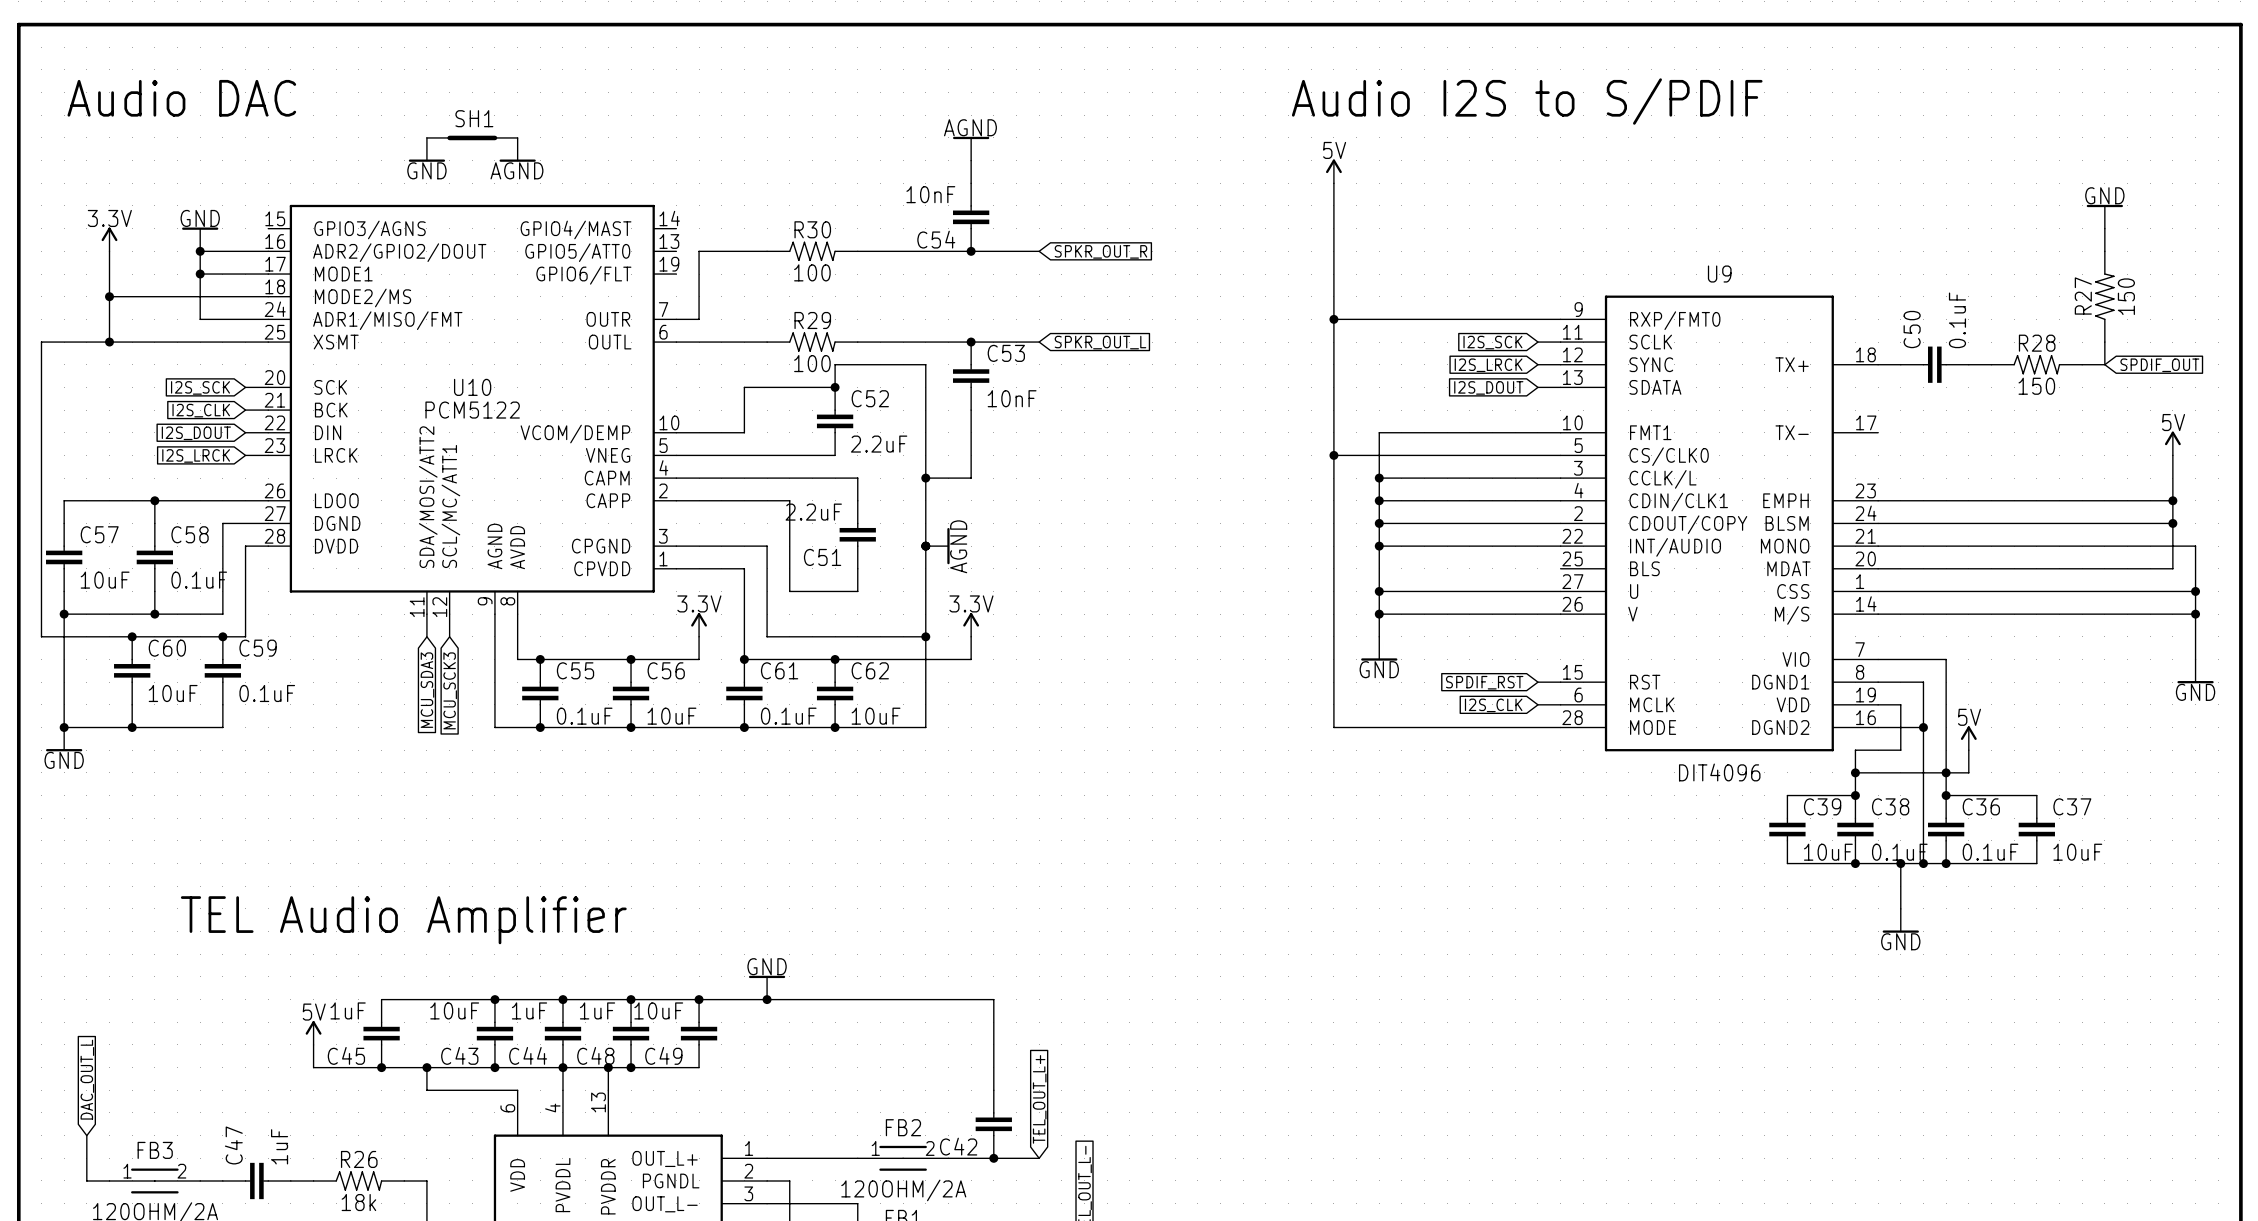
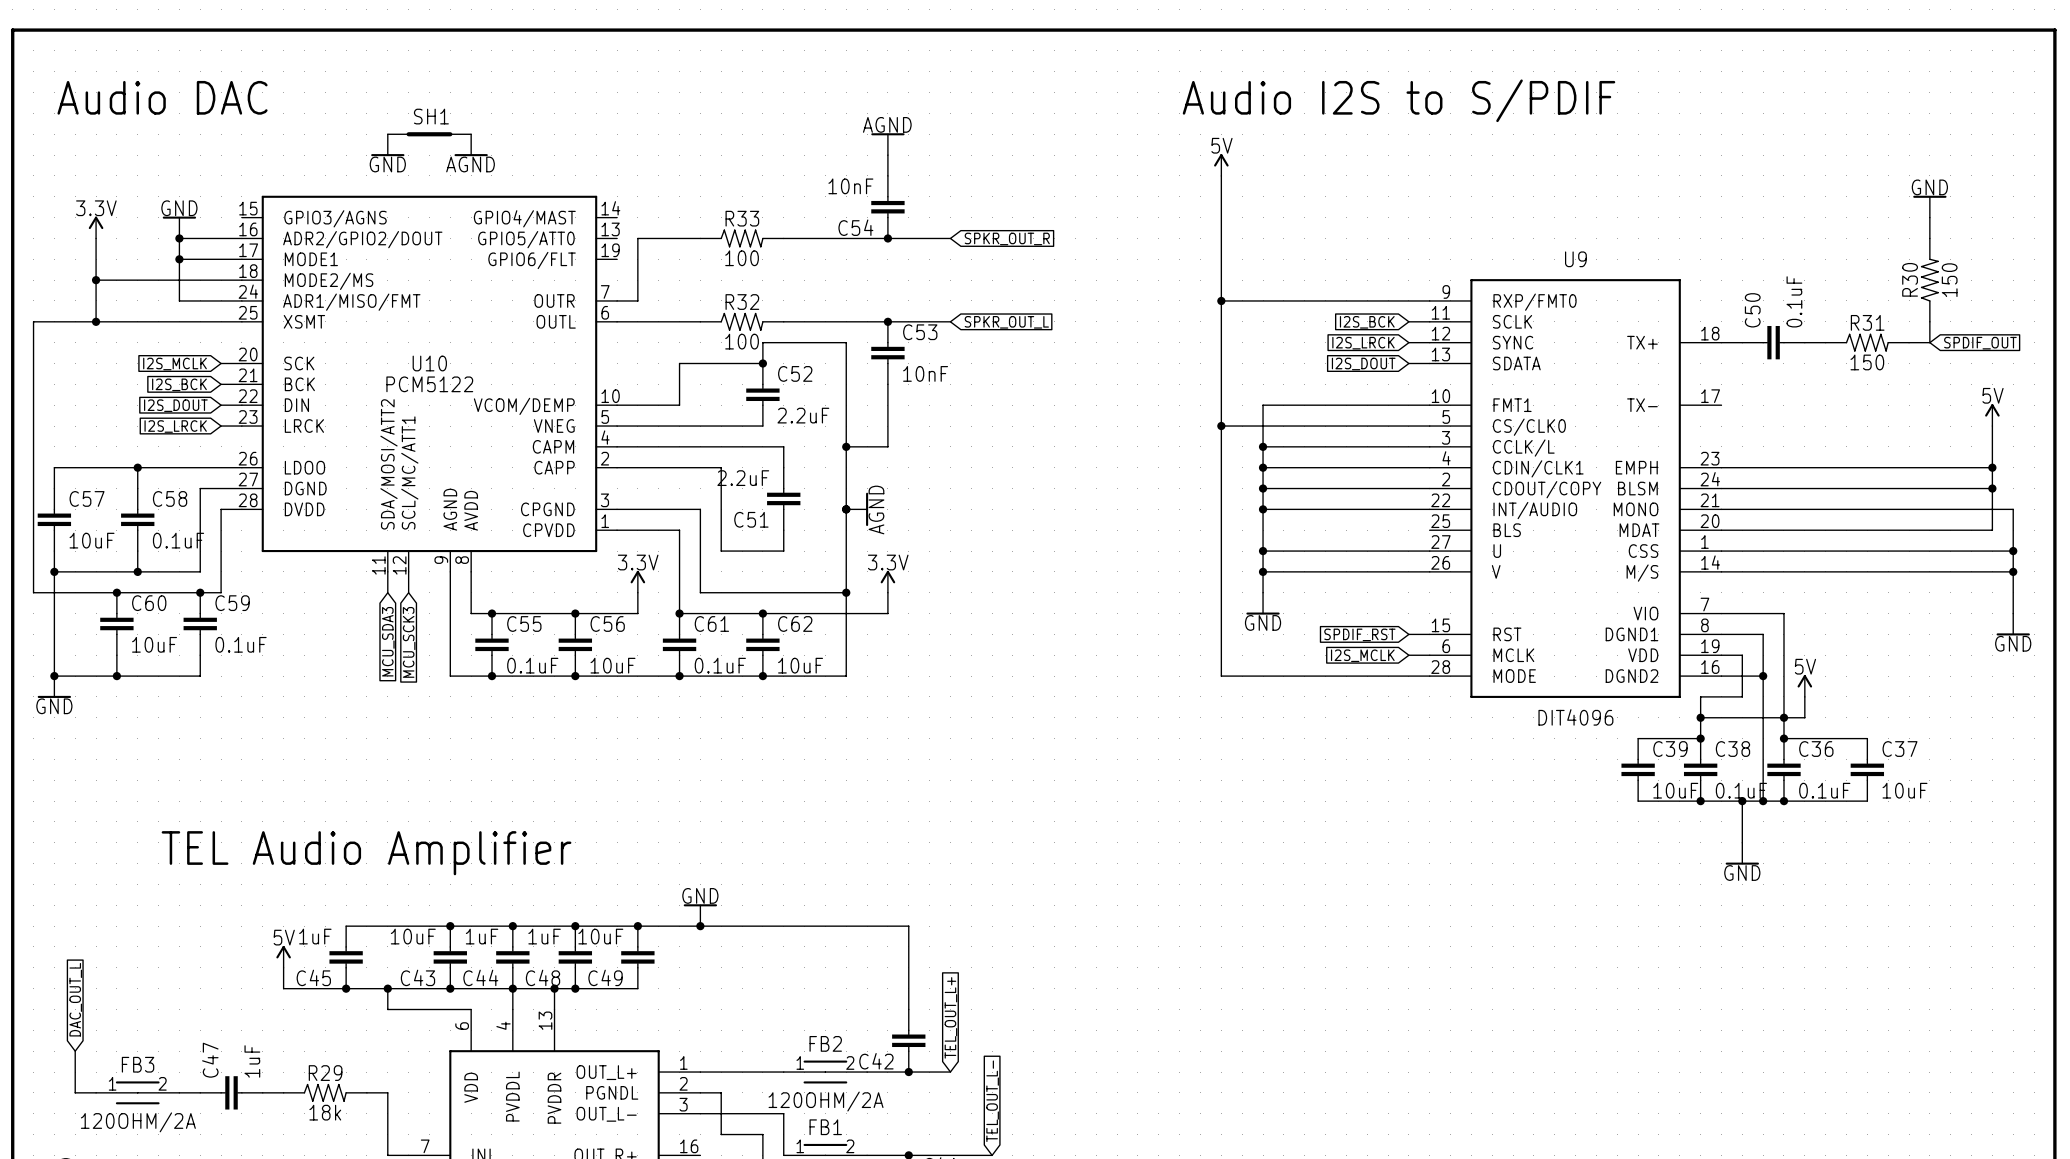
R30 name: R30 (812, 229) -> R33 (742, 218)
R27 name: R27 (2083, 296) -> R30 (1910, 279)
R29 name: R29 (812, 320) -> R32 (742, 302)
global label: I2S_SCK (1492, 342) -> I2S_BCK (1367, 322)
R28 name: R28 (2037, 343) -> R31 (1867, 322)
global label: I2S_SCK (200, 387) -> I2S_MCLK (174, 363)
global label: I2S_CLK (201, 410) -> I2S_BCK (179, 384)
global label: I2S_CLK (1493, 705) -> I2S_MCLK (1362, 655)
R26 name: R26 (359, 1159) -> R29 (325, 1073)

